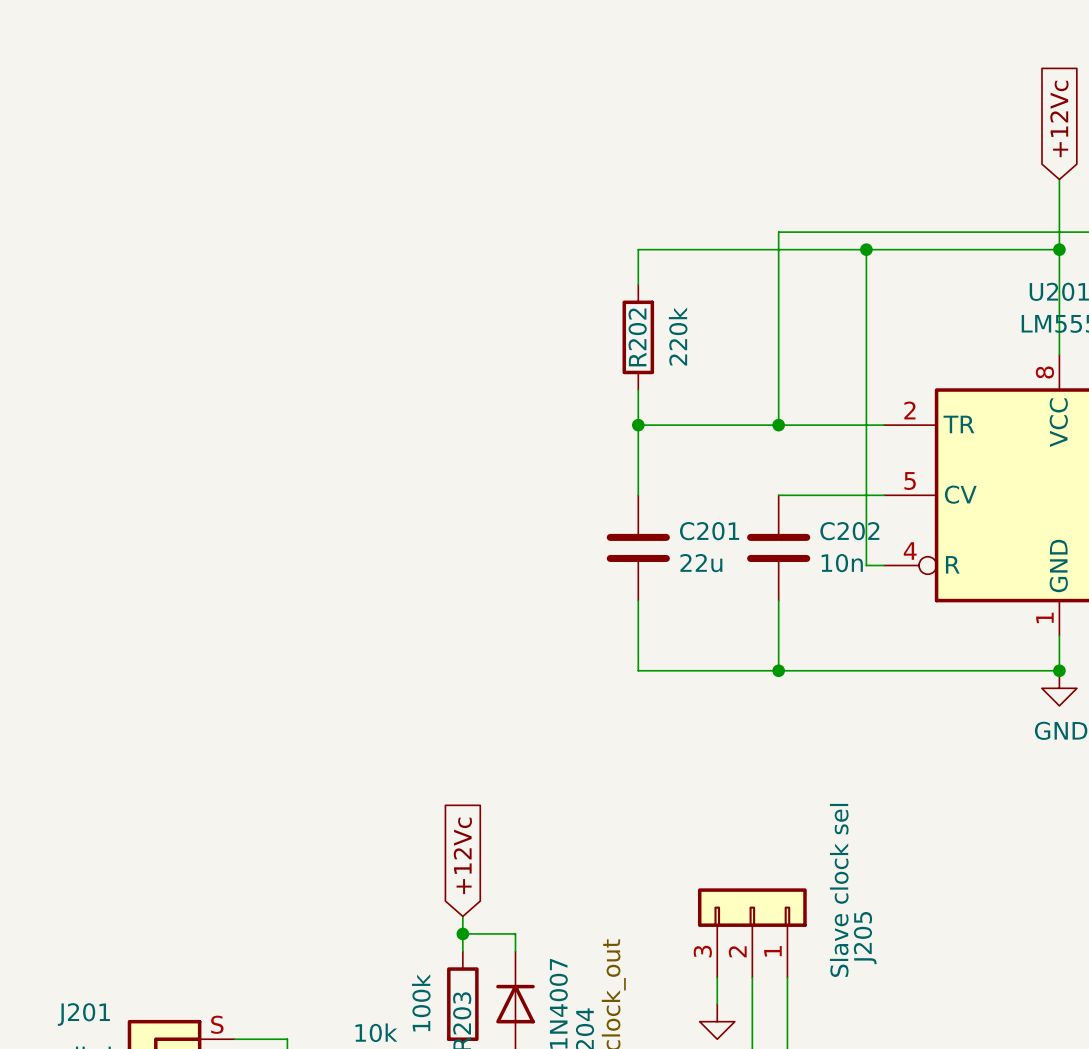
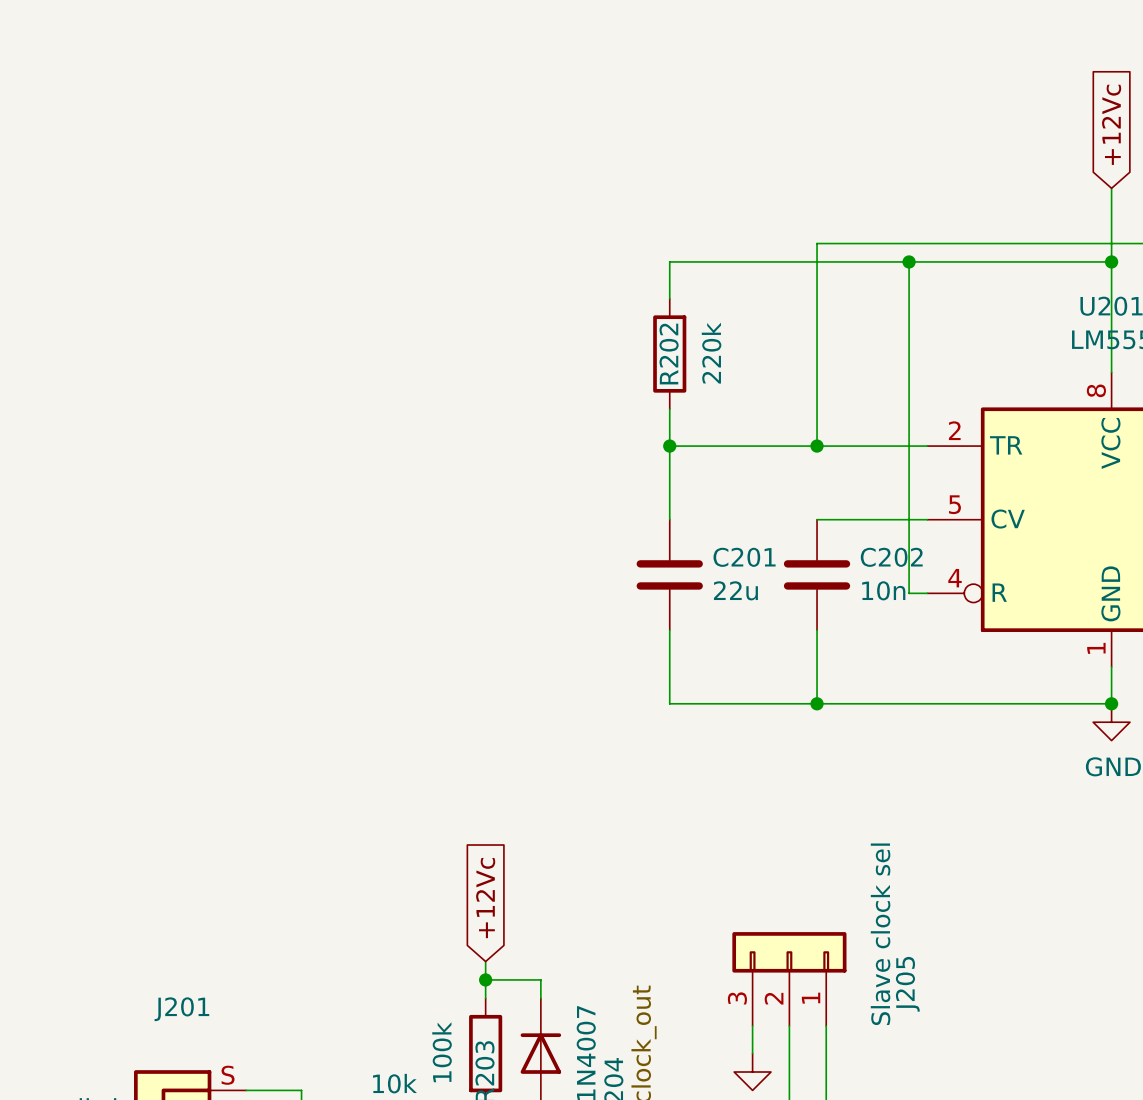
J201 name position: J201 (83, 1014) -> J201 (181, 1009)

